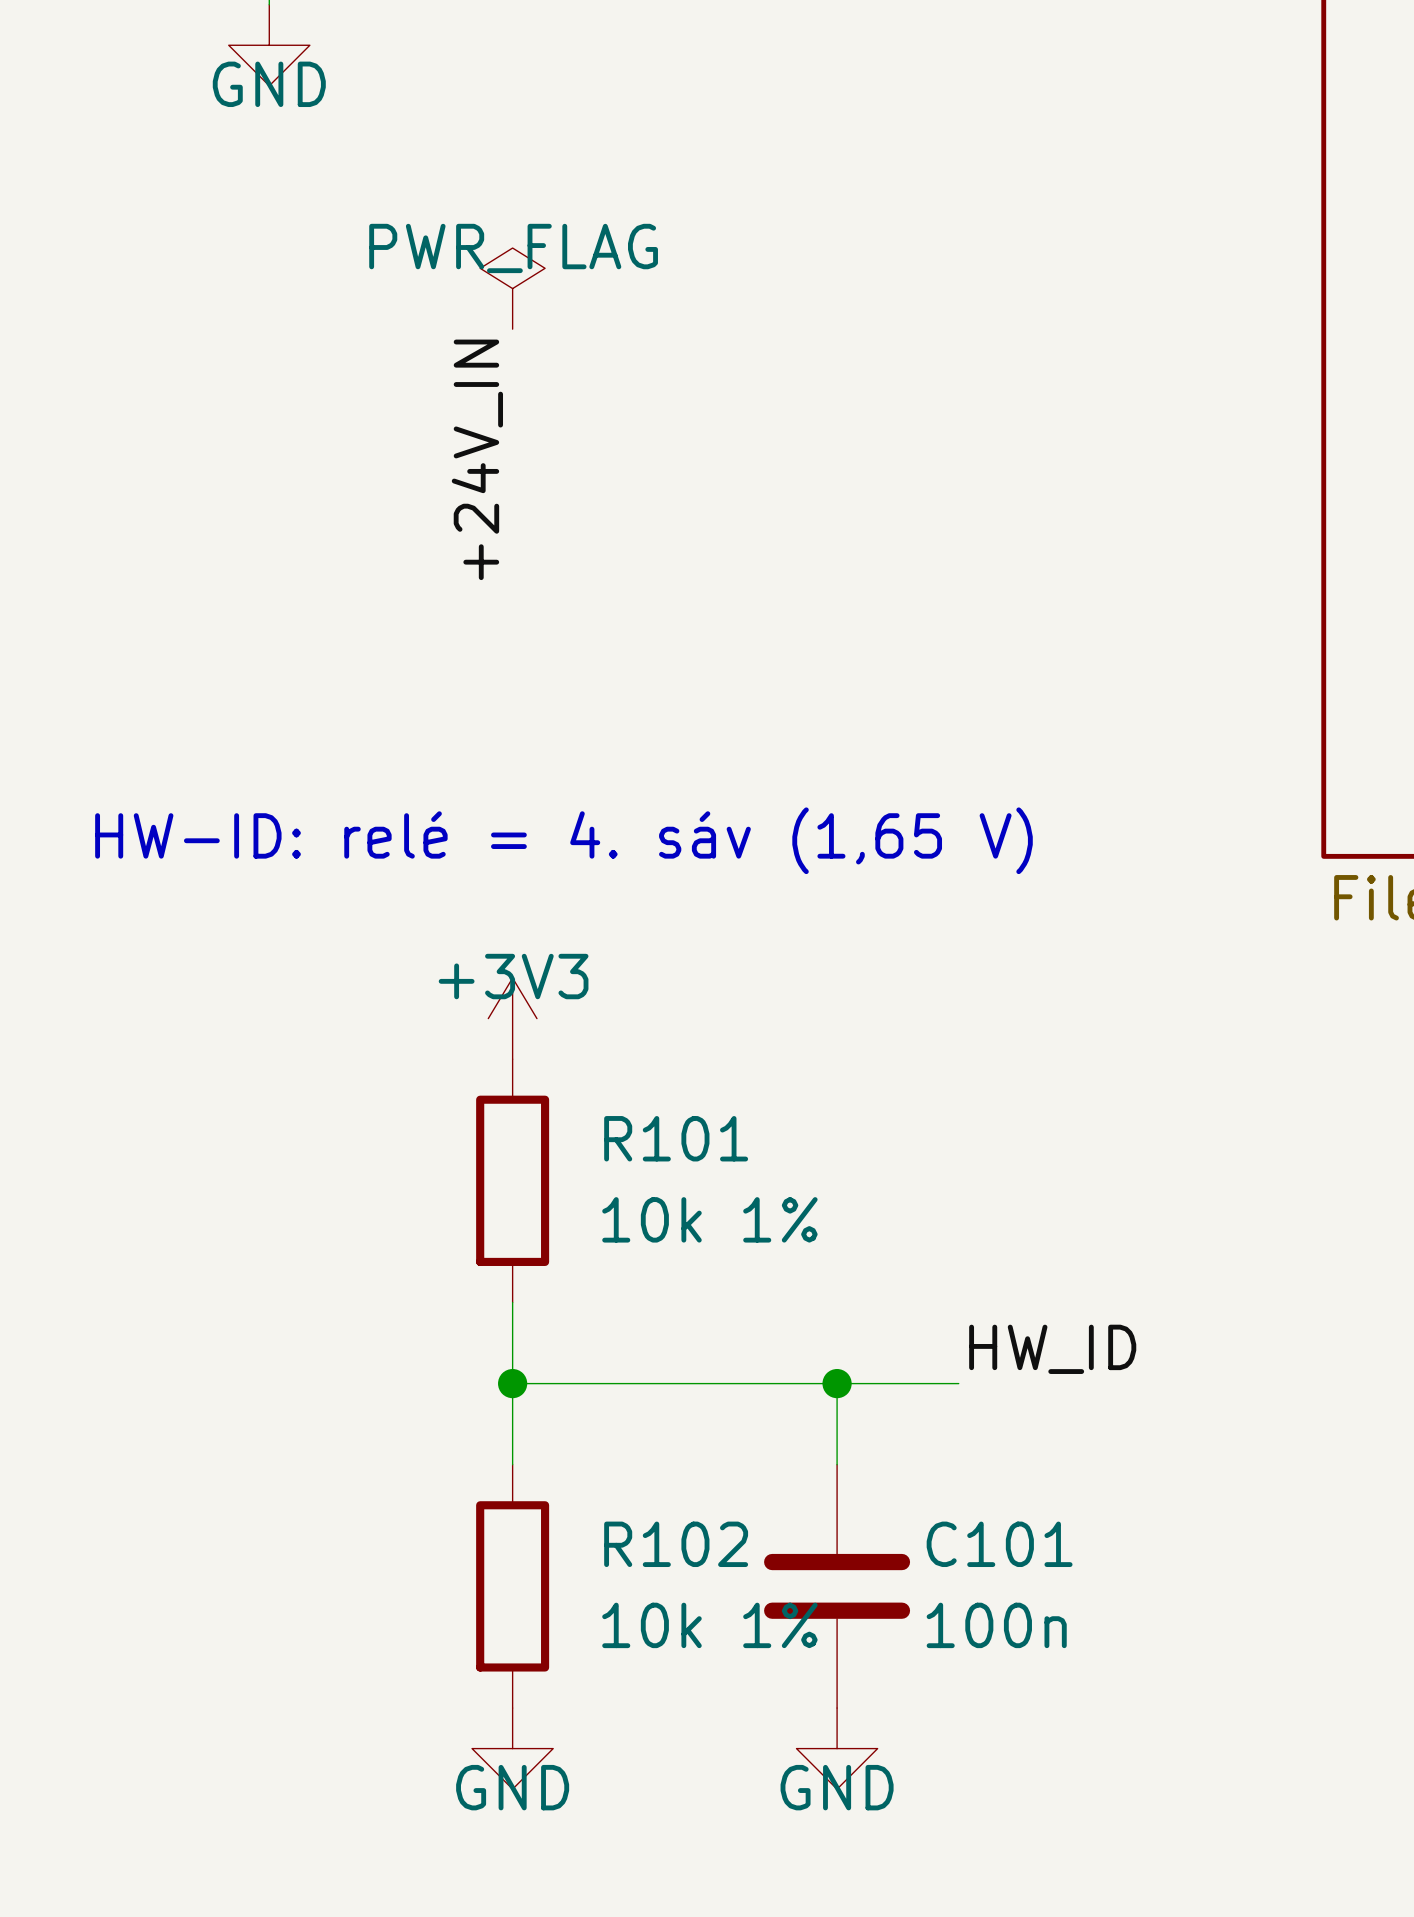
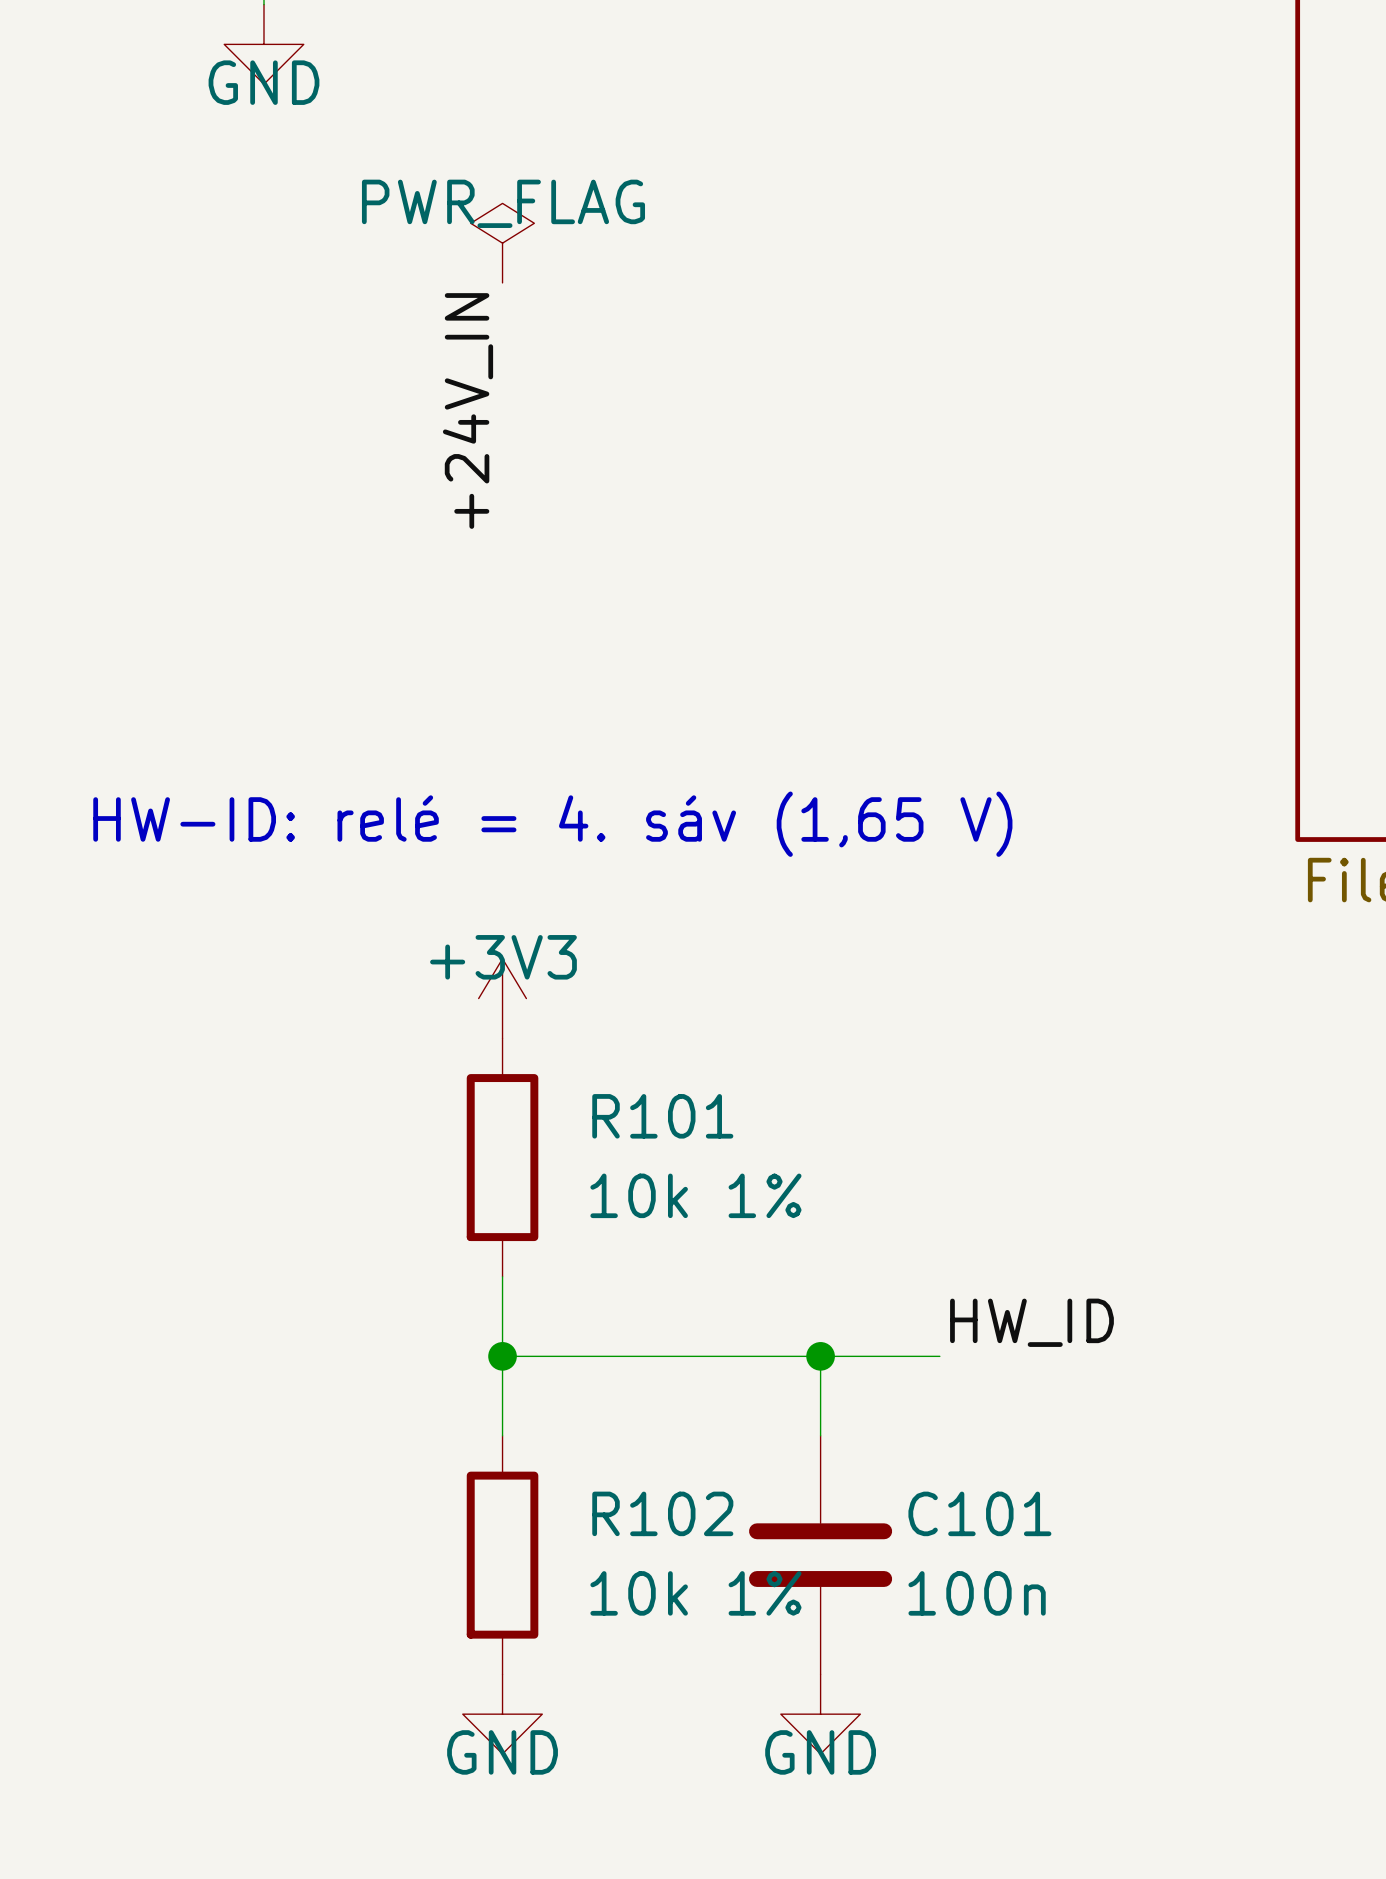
power symbol position: PWR_FLAG (512, 288) -> PWR_FLAG (502, 243)
label position: +24V_IN (477, 459) -> +24V_IN (468, 411)

